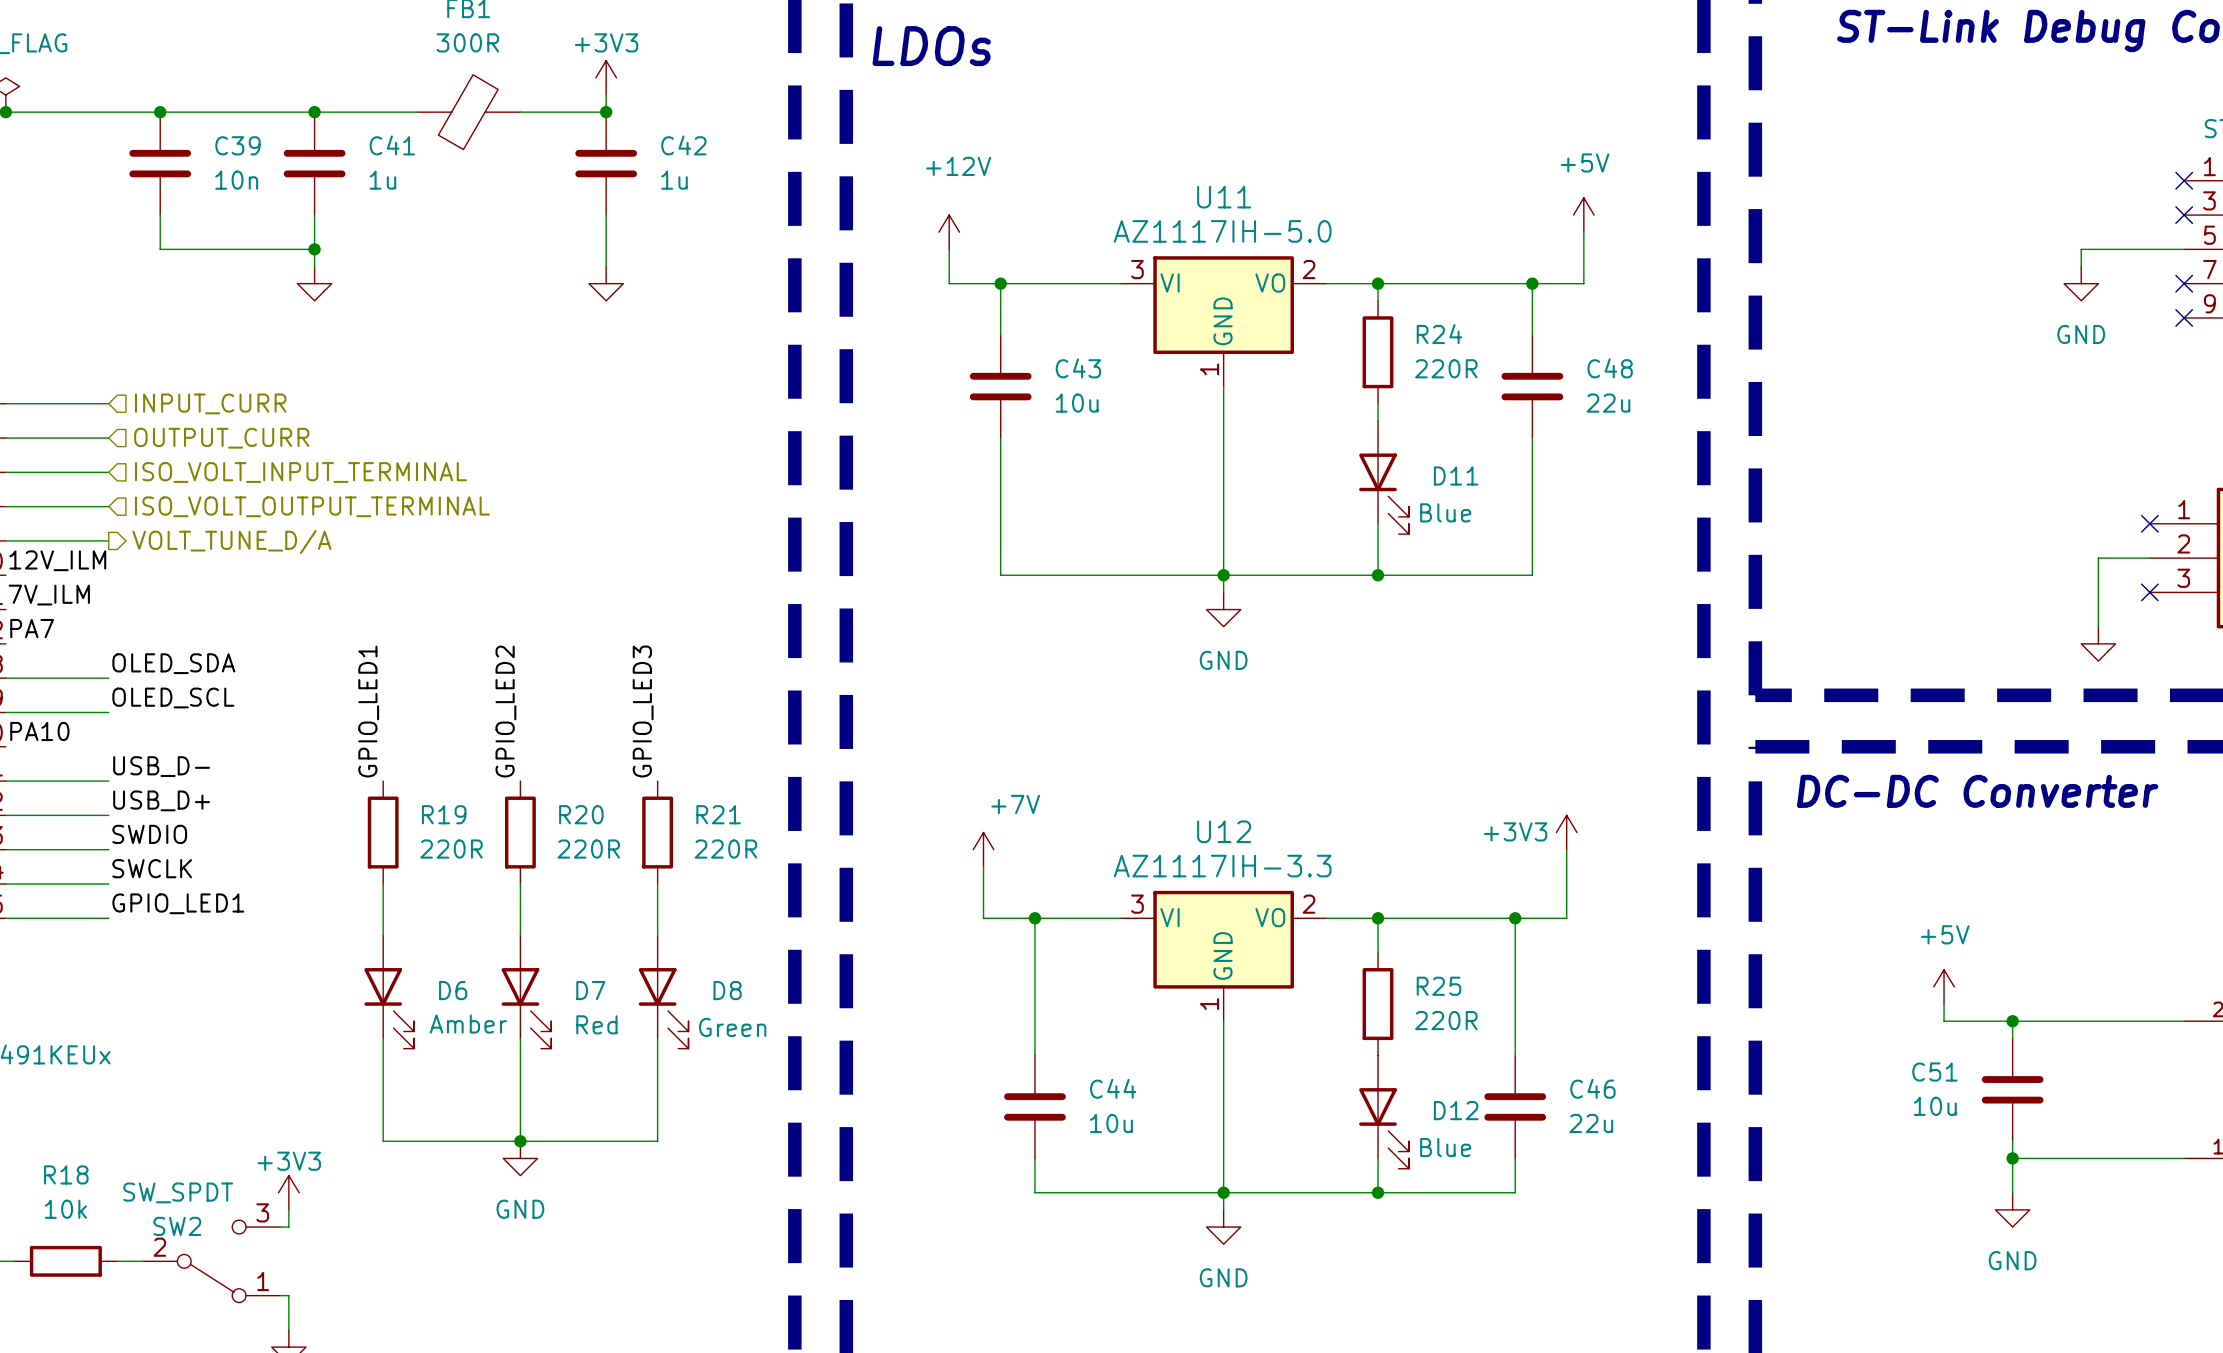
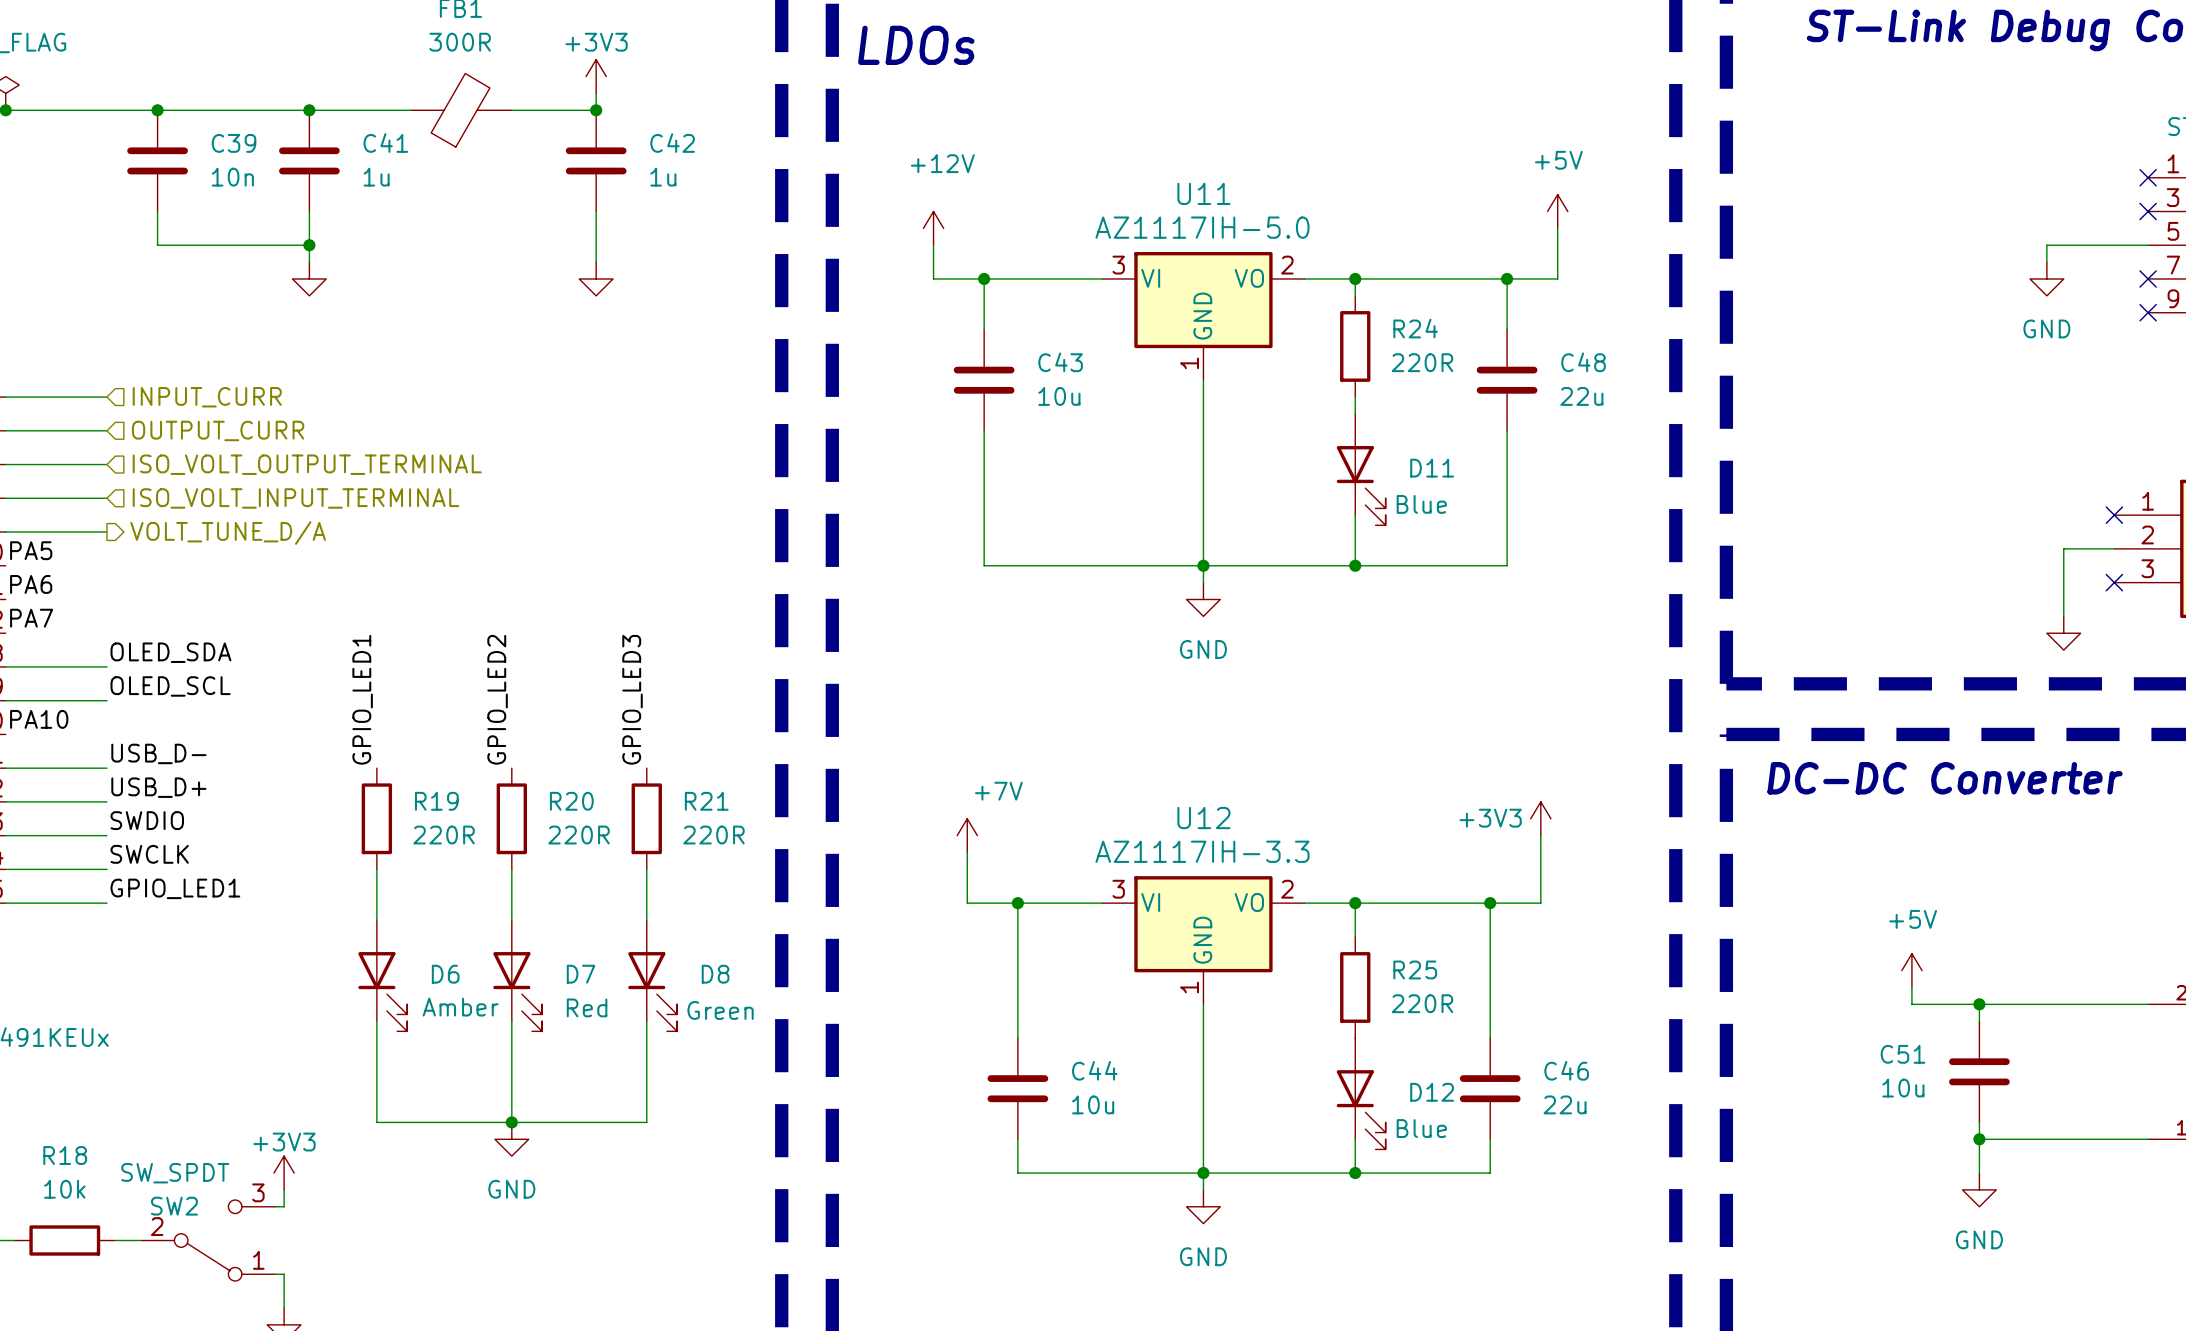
hierarchical label: ISO_VOLT_INPUT_TERMINAL (300, 472) -> ISO_VOLT_OUTPUT_TERMINAL (307, 464)
hierarchical label: ISO_VOLT_OUTPUT_TERMINAL (312, 506) -> ISO_VOLT_INPUT_TERMINAL (296, 498)
label: 12V_ILM (57, 560) -> PA5 (31, 550)
label: 7V_ILM (49, 595) -> PA6 (31, 584)

